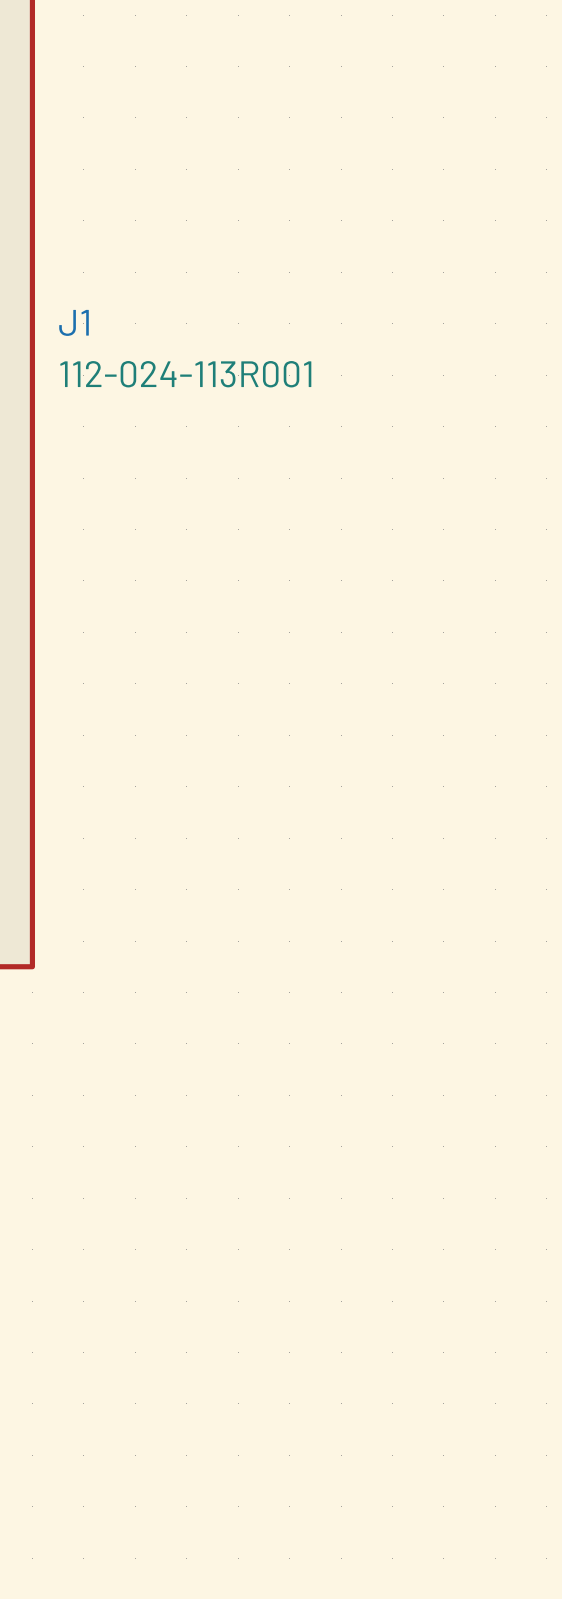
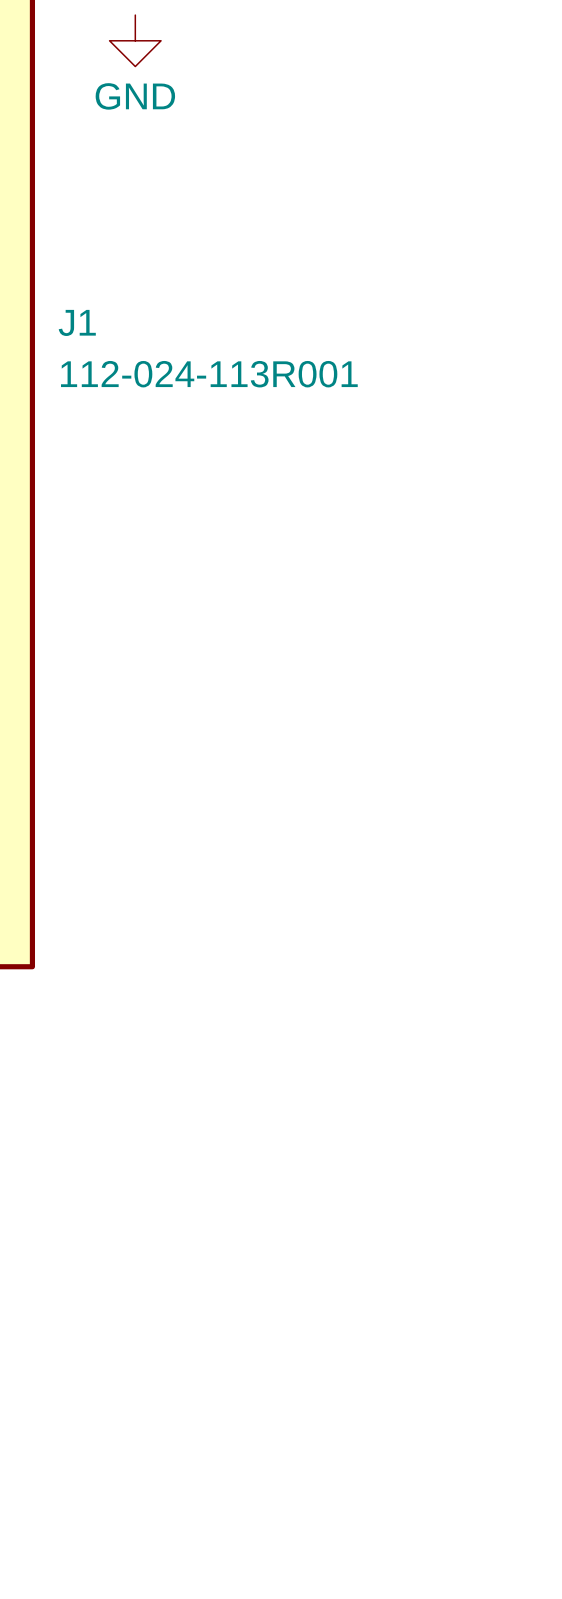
power symbol: none -> GND (135, 40)

